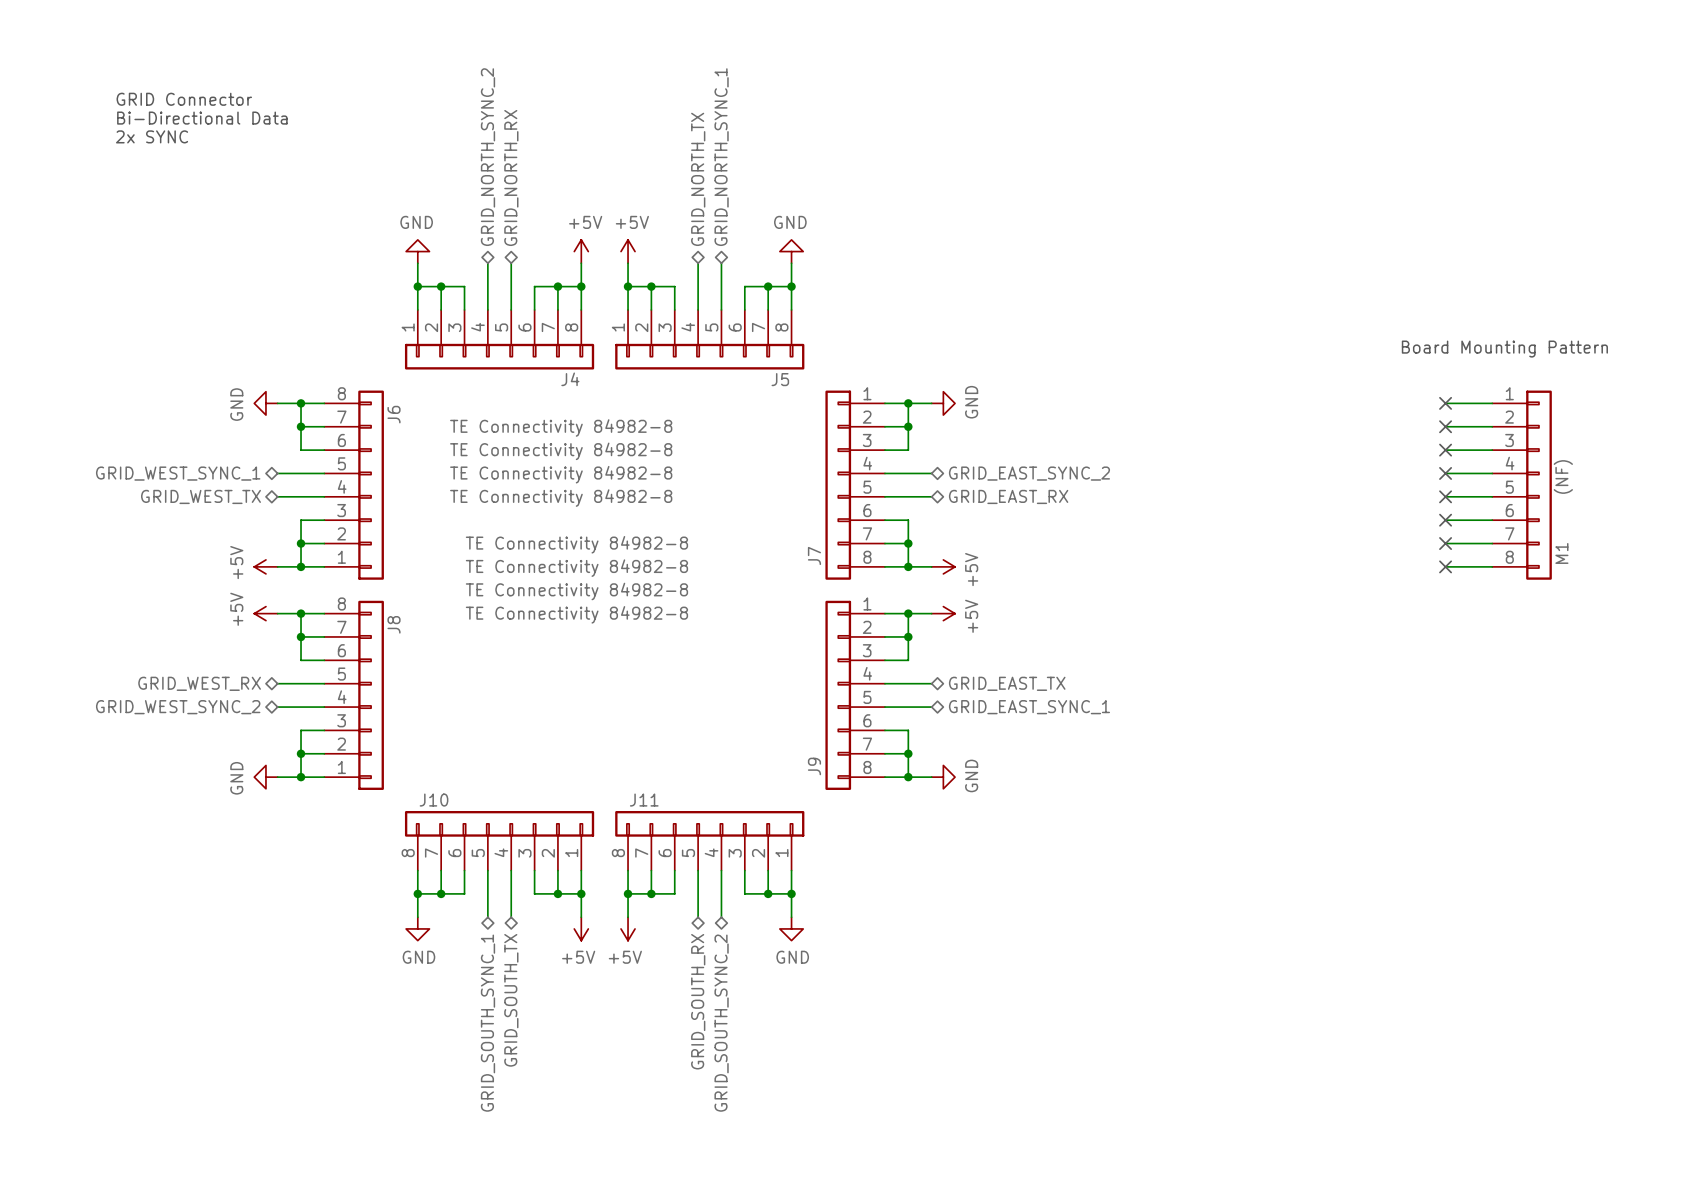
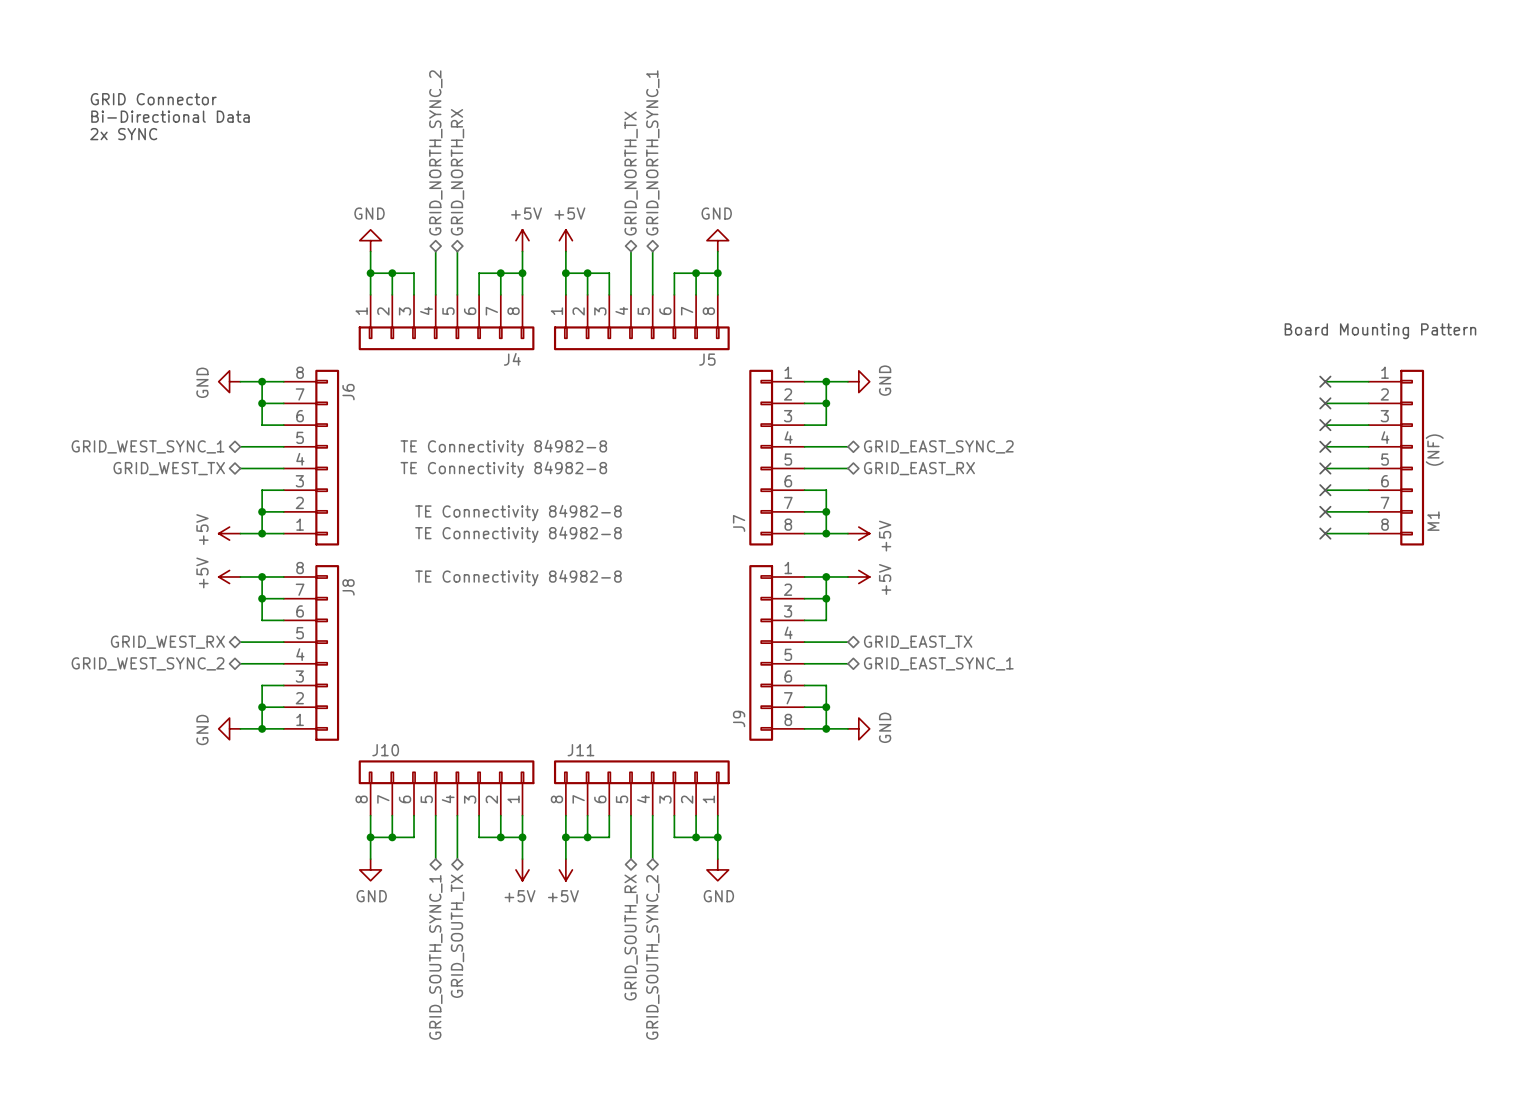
J4 value: TE Connectivity 84982-8 (561, 427) -> none
J5 value: TE Connectivity 84982-8 (561, 451) -> none
J8 value: TE Connectivity 84982-8 (576, 591) -> none

